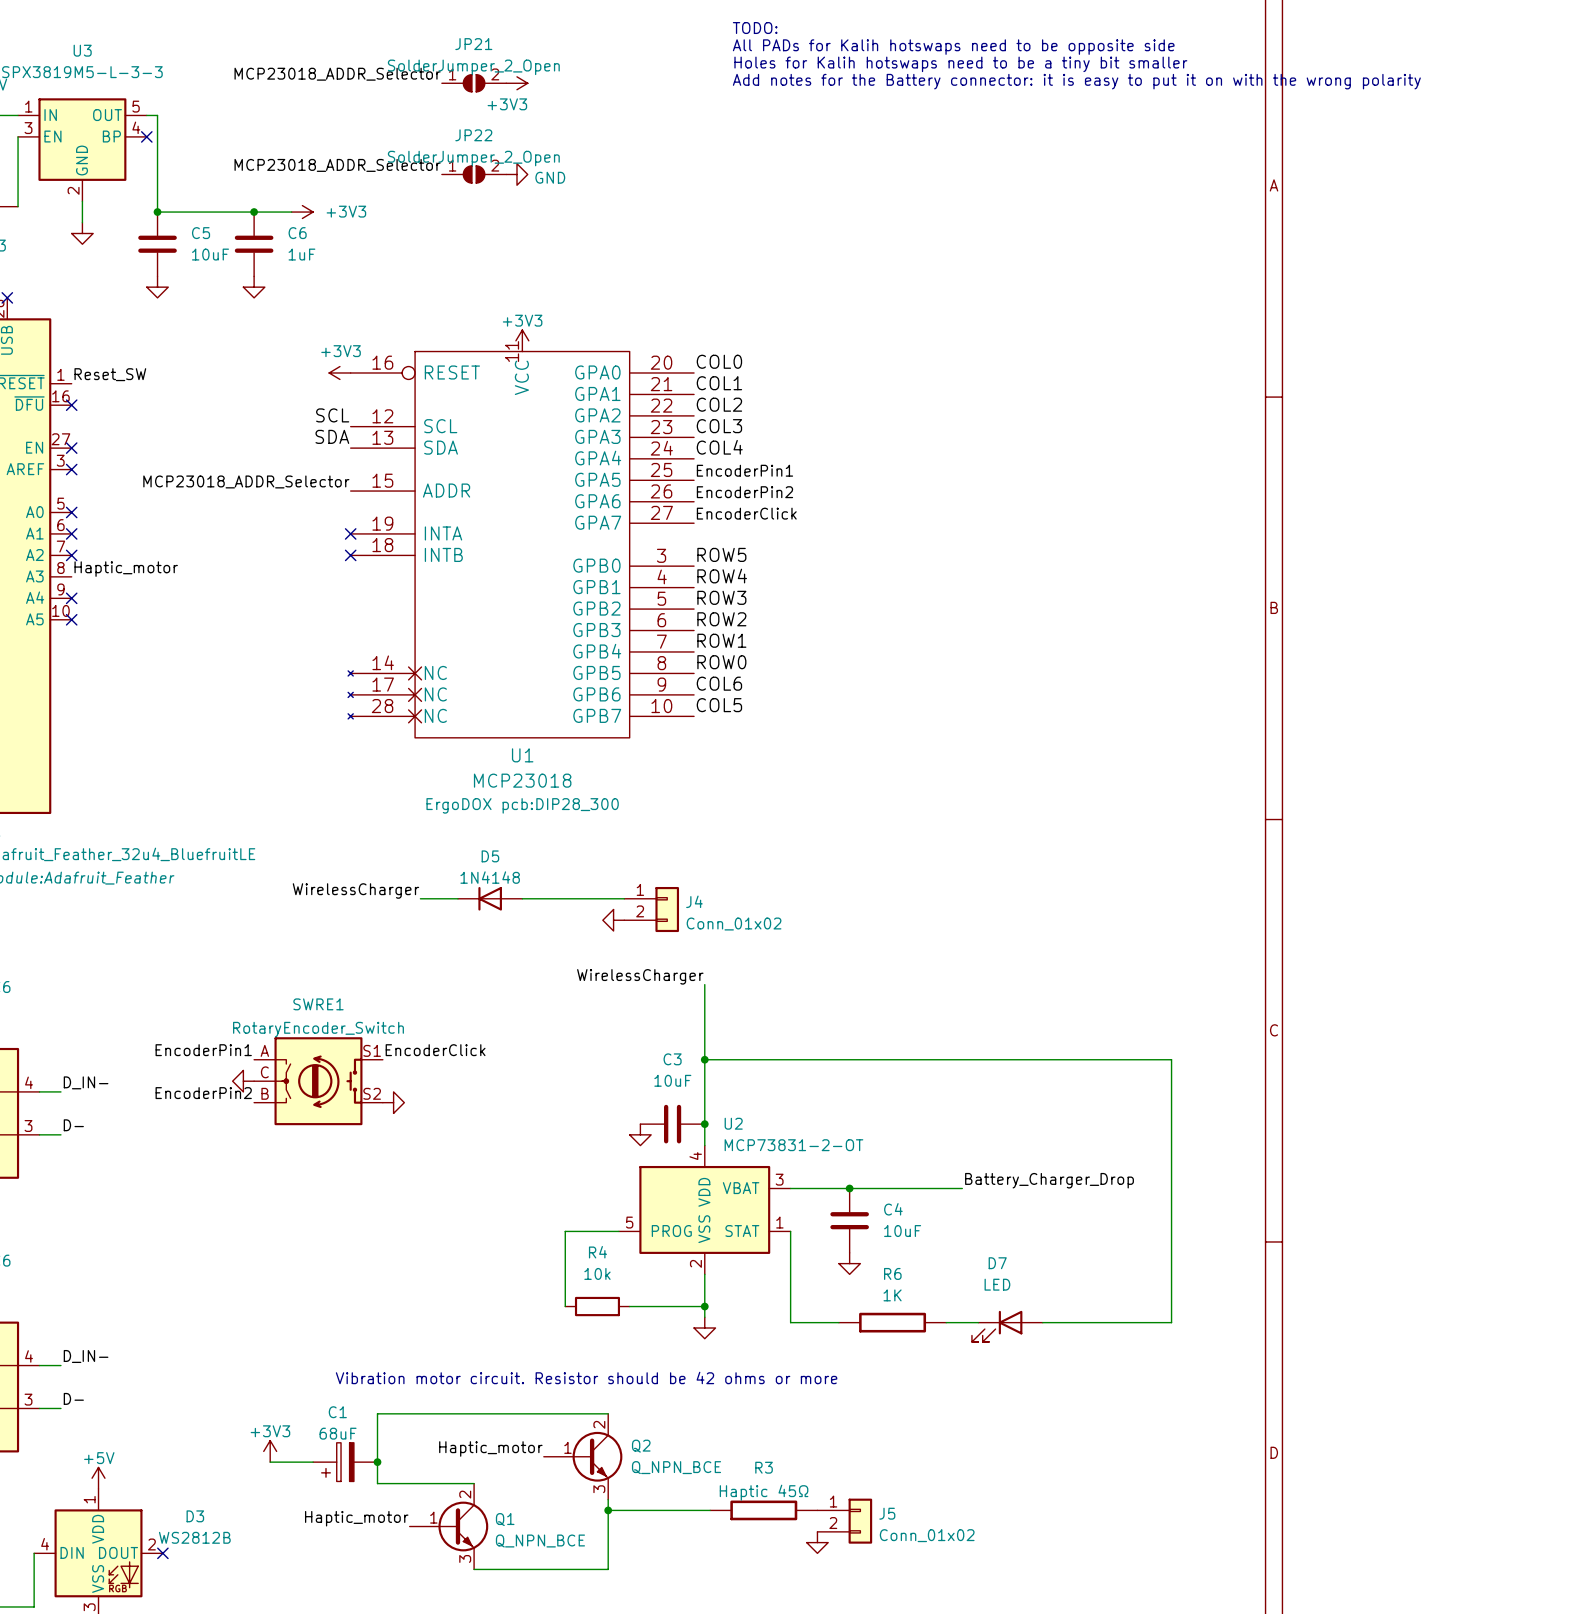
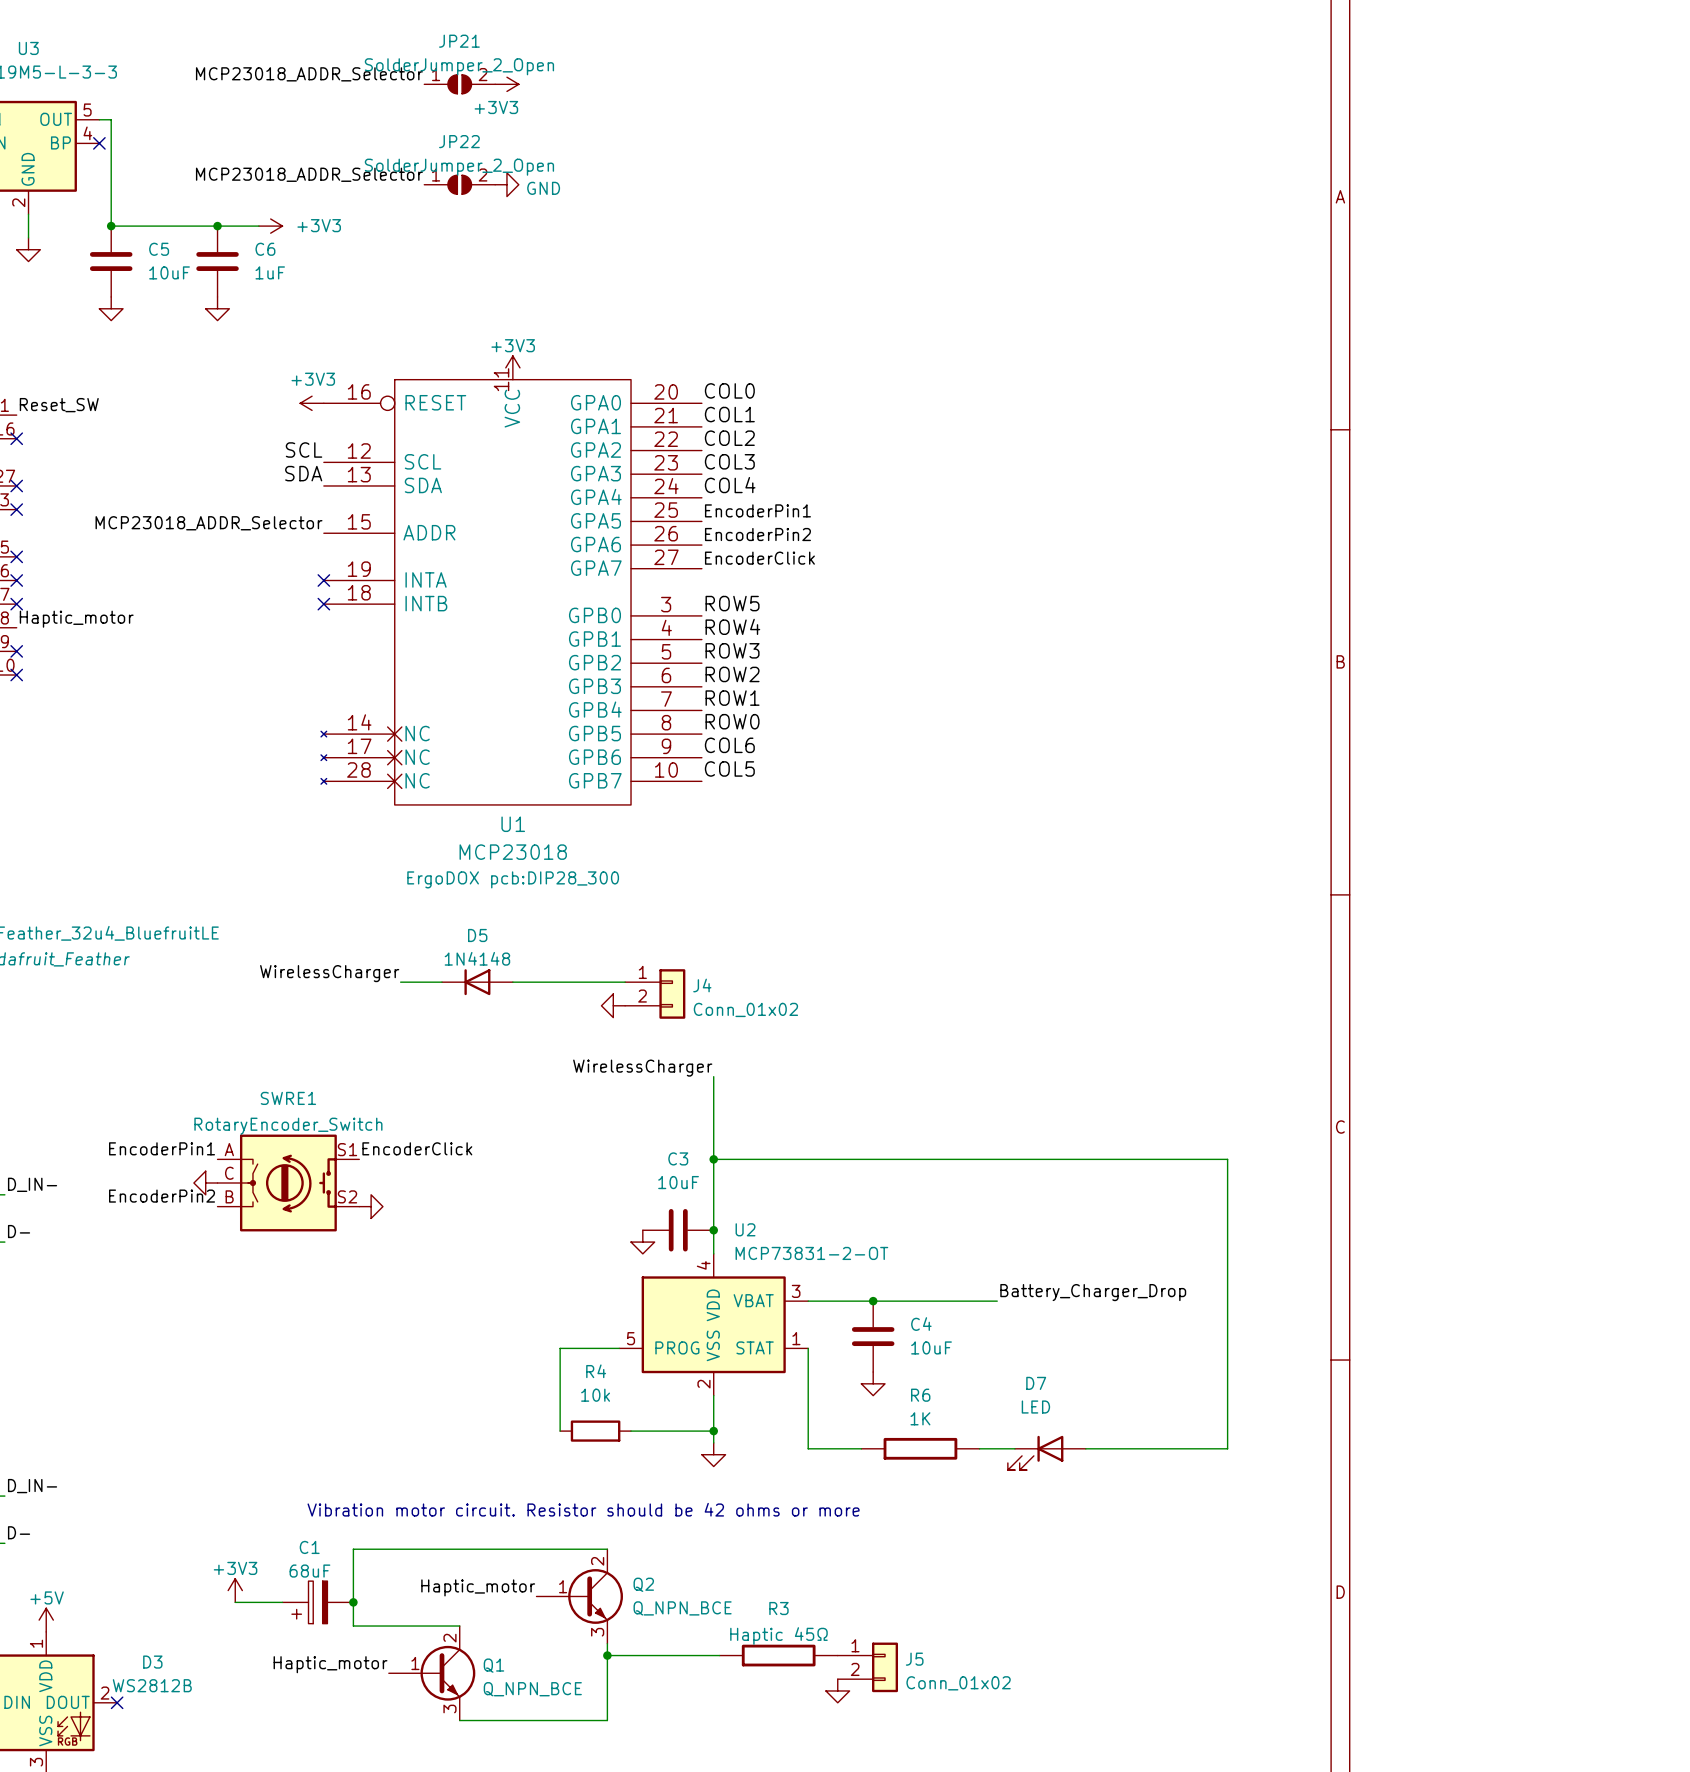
text: TODO: (755, 28) -> none
text: All PADs for Kalih hotswaps need to be opposite side (953, 47) -> none
text: Holes for Kalih hotswaps need to be a tiny bit smaller (960, 64) -> none
text: Add notes for the Battery connector: it is easy to put it on with the wrong polarity (1076, 81) -> none

